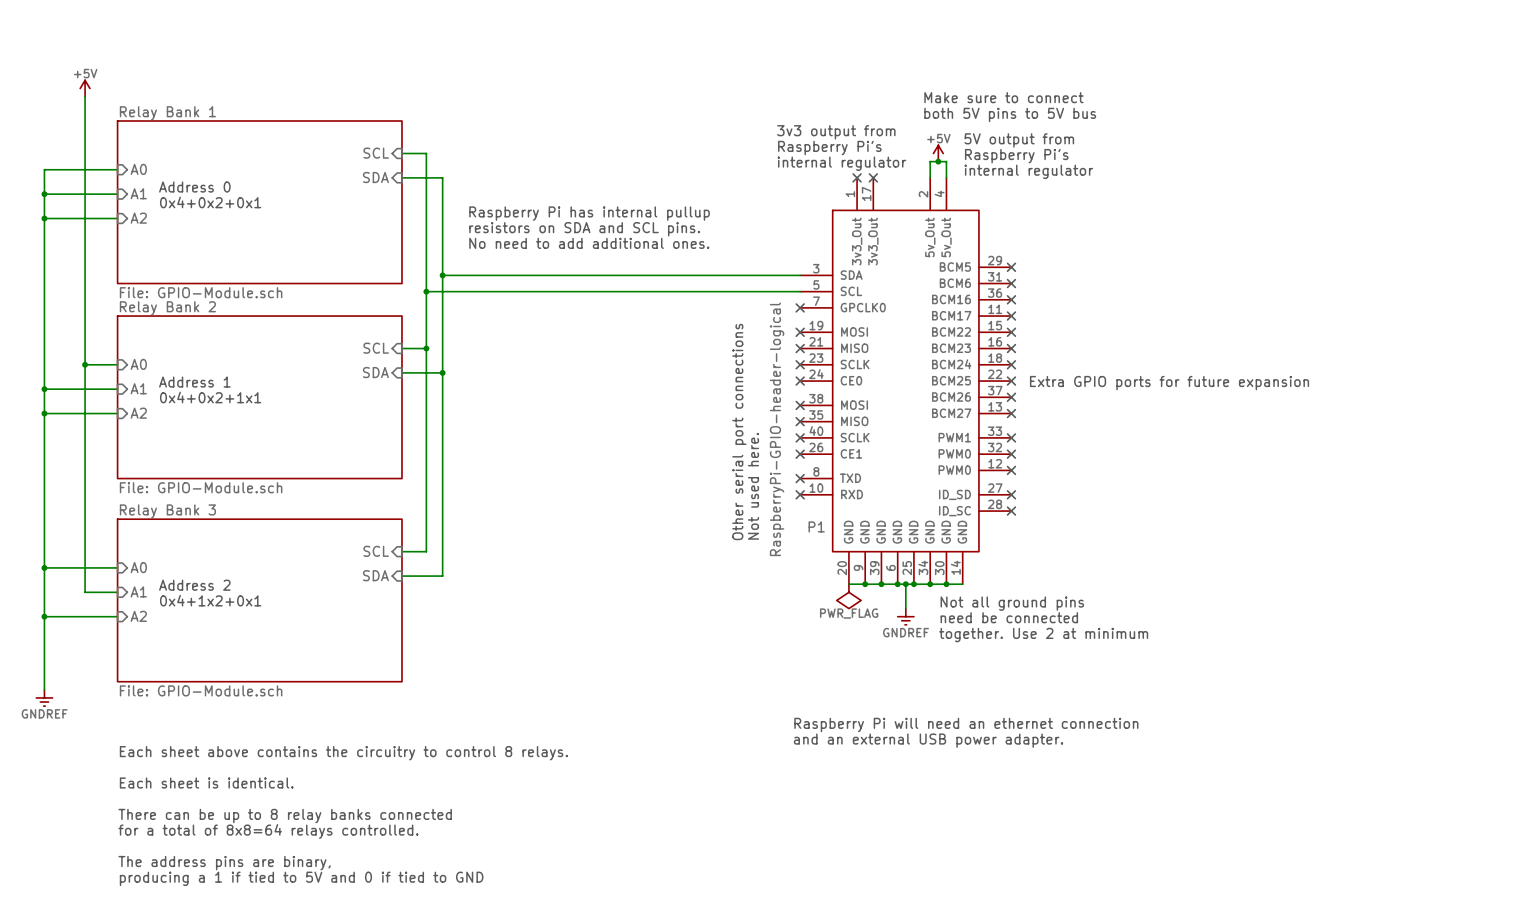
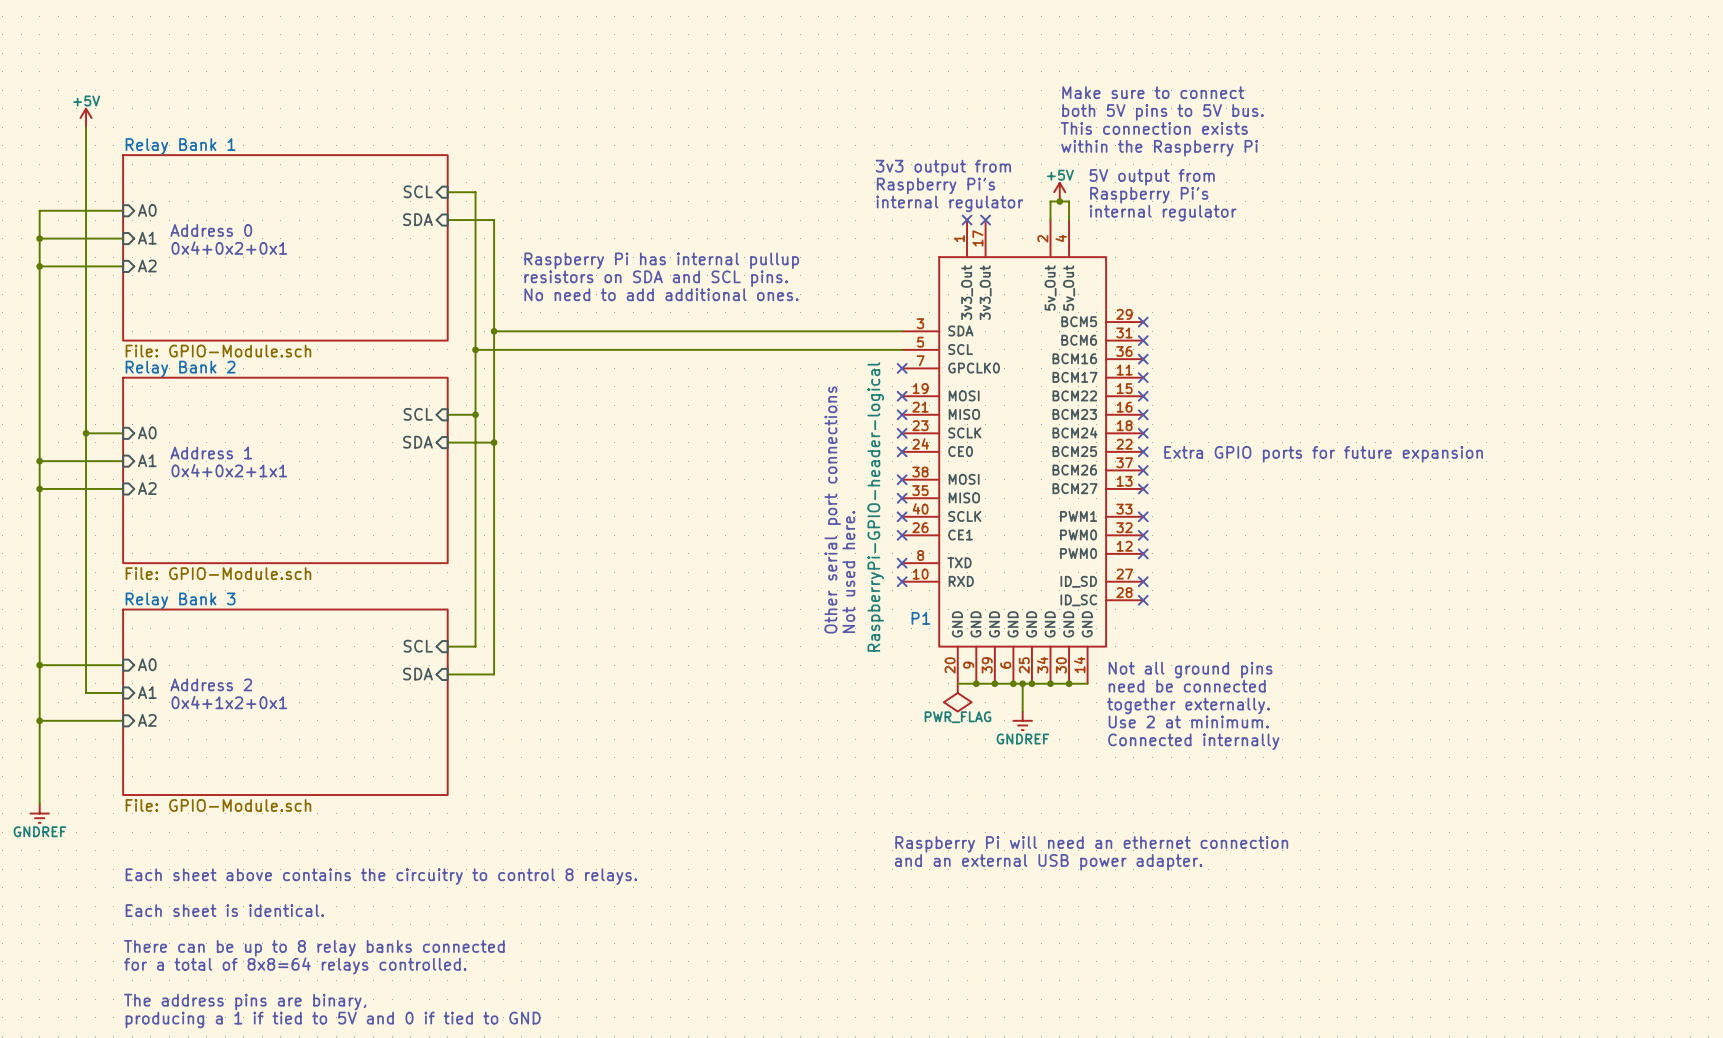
text: none -> both 5V pins to 5V bus. (1163, 112)
text position: Make sure to connect (1003, 97) -> Make sure to connect (1153, 92)
text: none -> This connection exists (1154, 128)
text: both 5V pins to 5V bus (1010, 114) -> none
text: none -> within the Raspberry Pi (1159, 148)
text position: Not all ground pins (1012, 603) -> Not all ground pins (1190, 670)
text: none -> together externally. (1188, 705)
text position: need be connected (1009, 617) -> need be connected (1187, 686)
text: together. Use 2 at minimum (1043, 635) -> Use 2 at minimum. (1188, 721)
text: none -> Connected internally (1193, 741)

